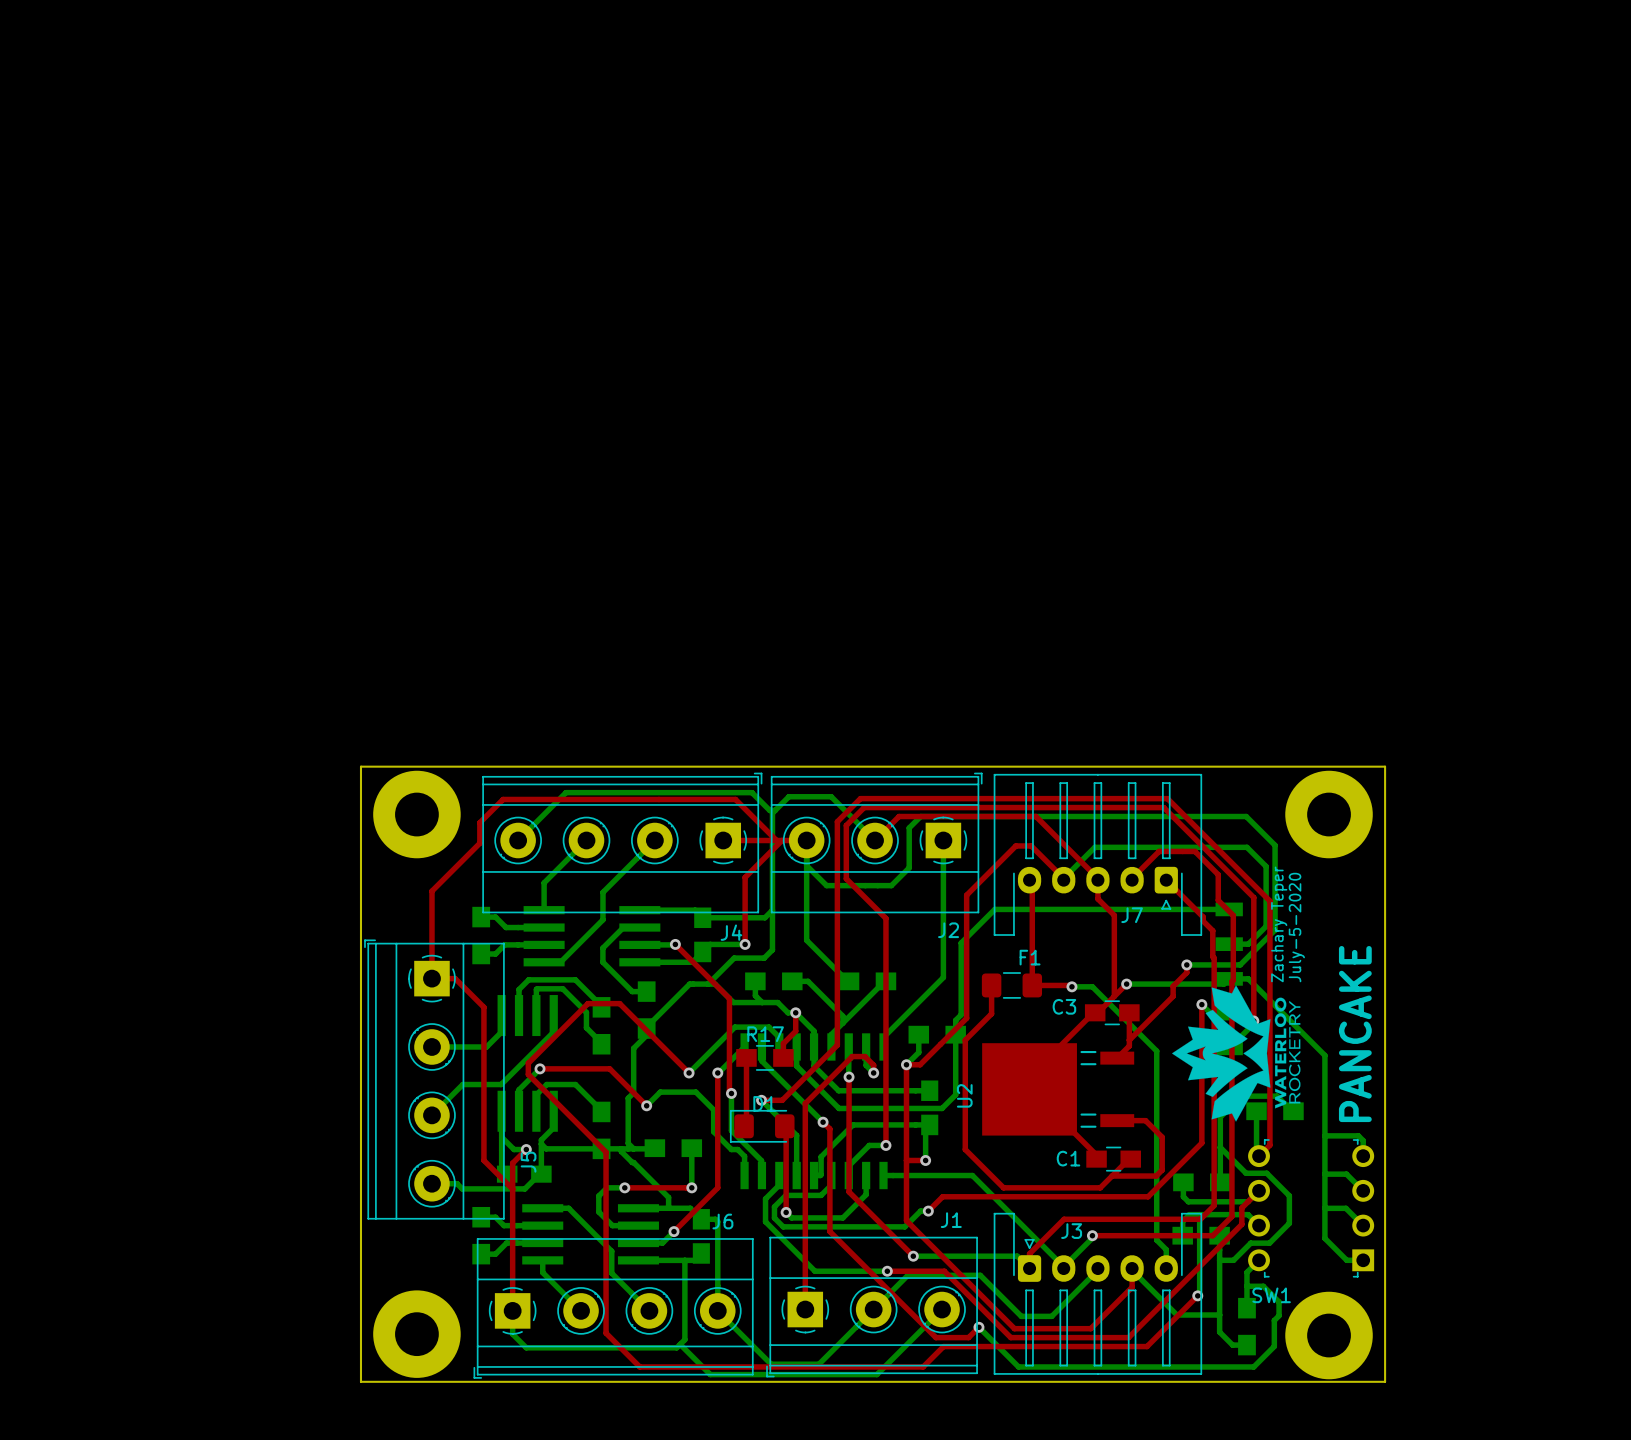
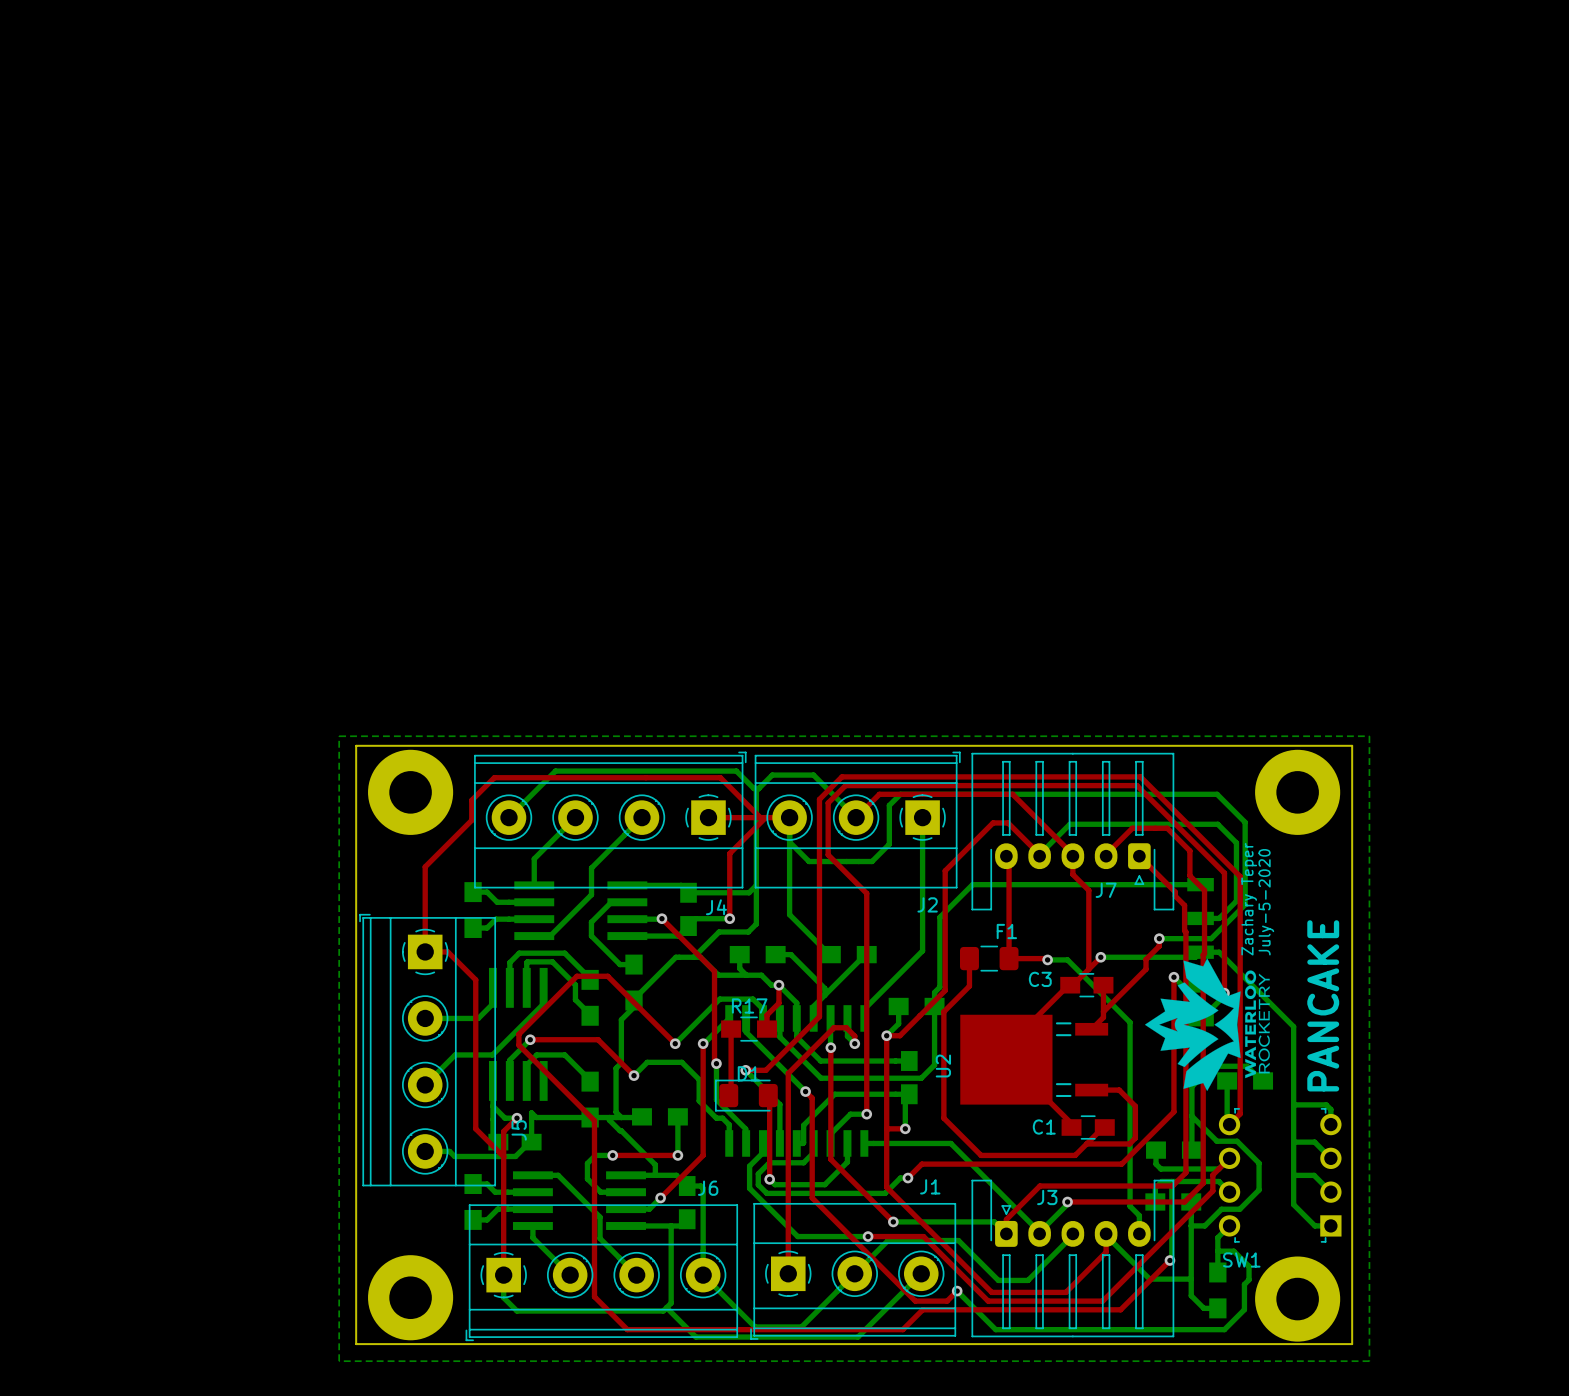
bottom zone outline: none -> (339, 736) (1369, 736) (1369, 1361) (339, 1361) (339, 736)
bottom track: (553, 1127) (541, 1140) (541, 1144) -> none

